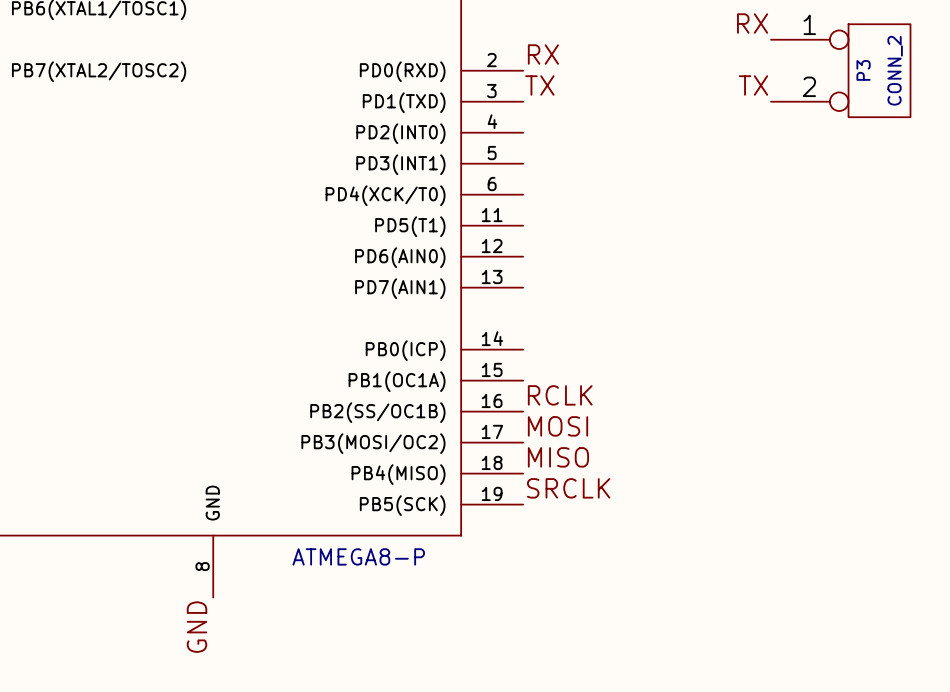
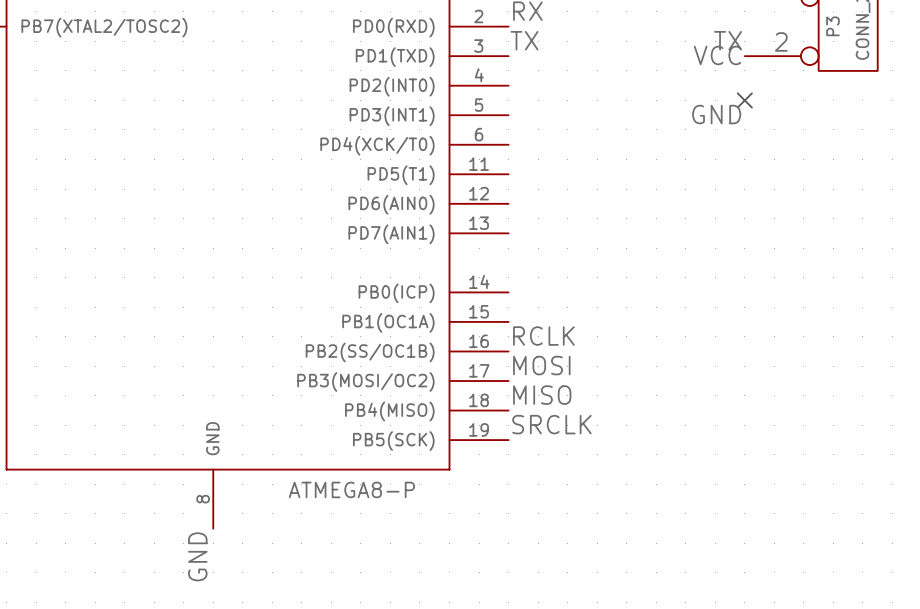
label: none -> VCC (717, 55)
no-connect mark: none -> (744, 100)
label: none -> GND (716, 114)

